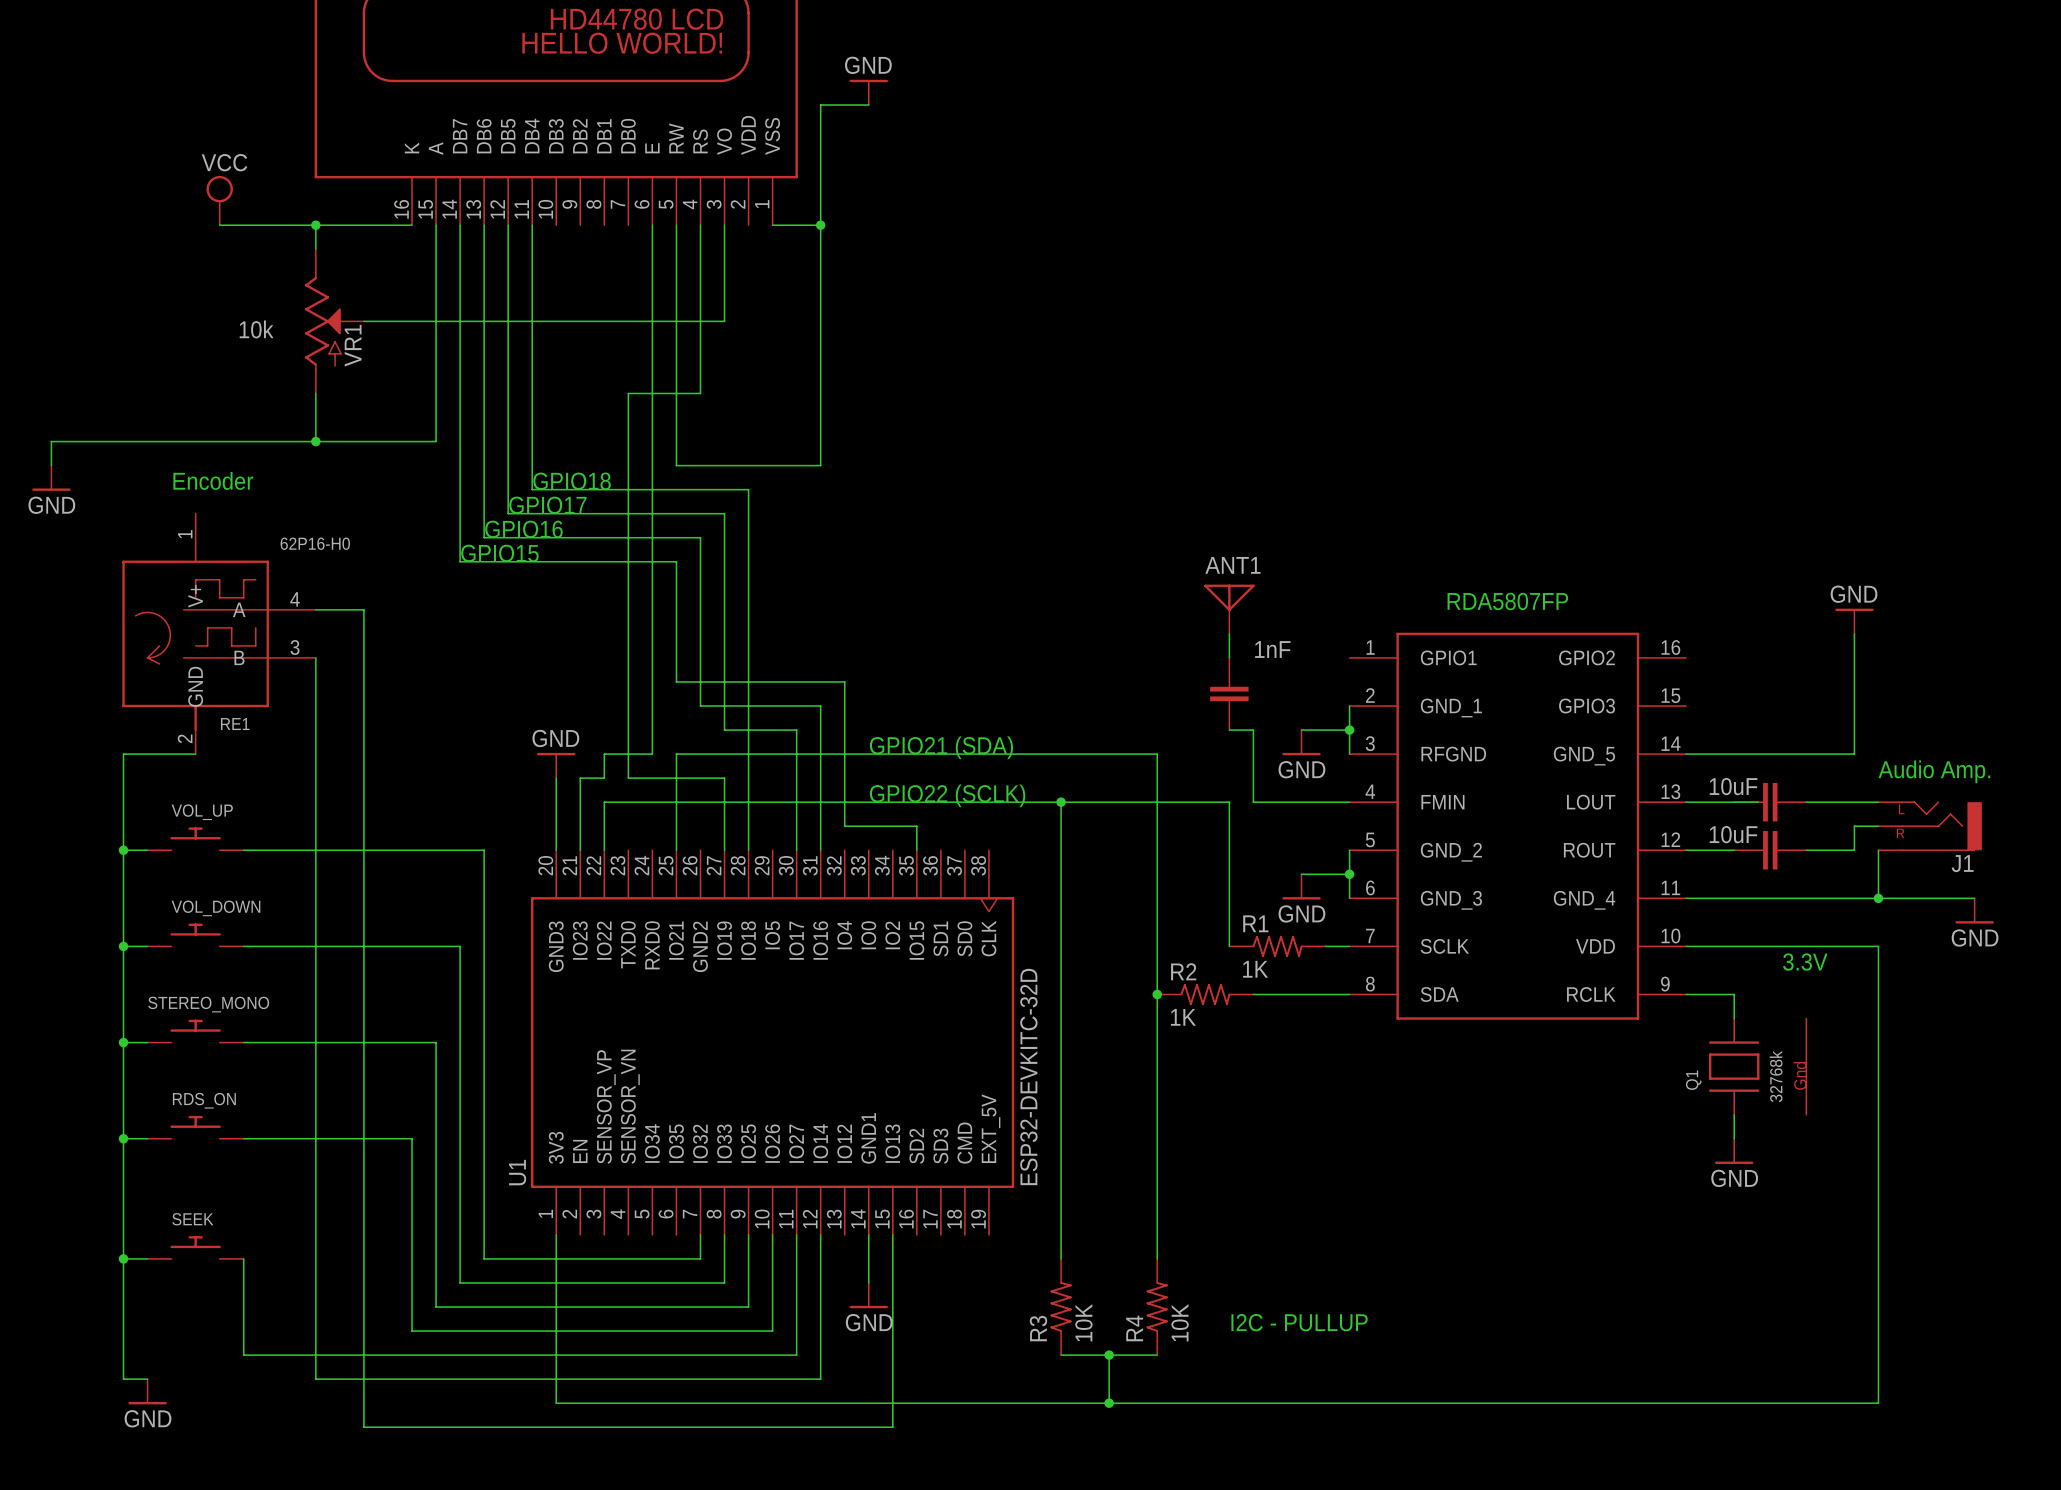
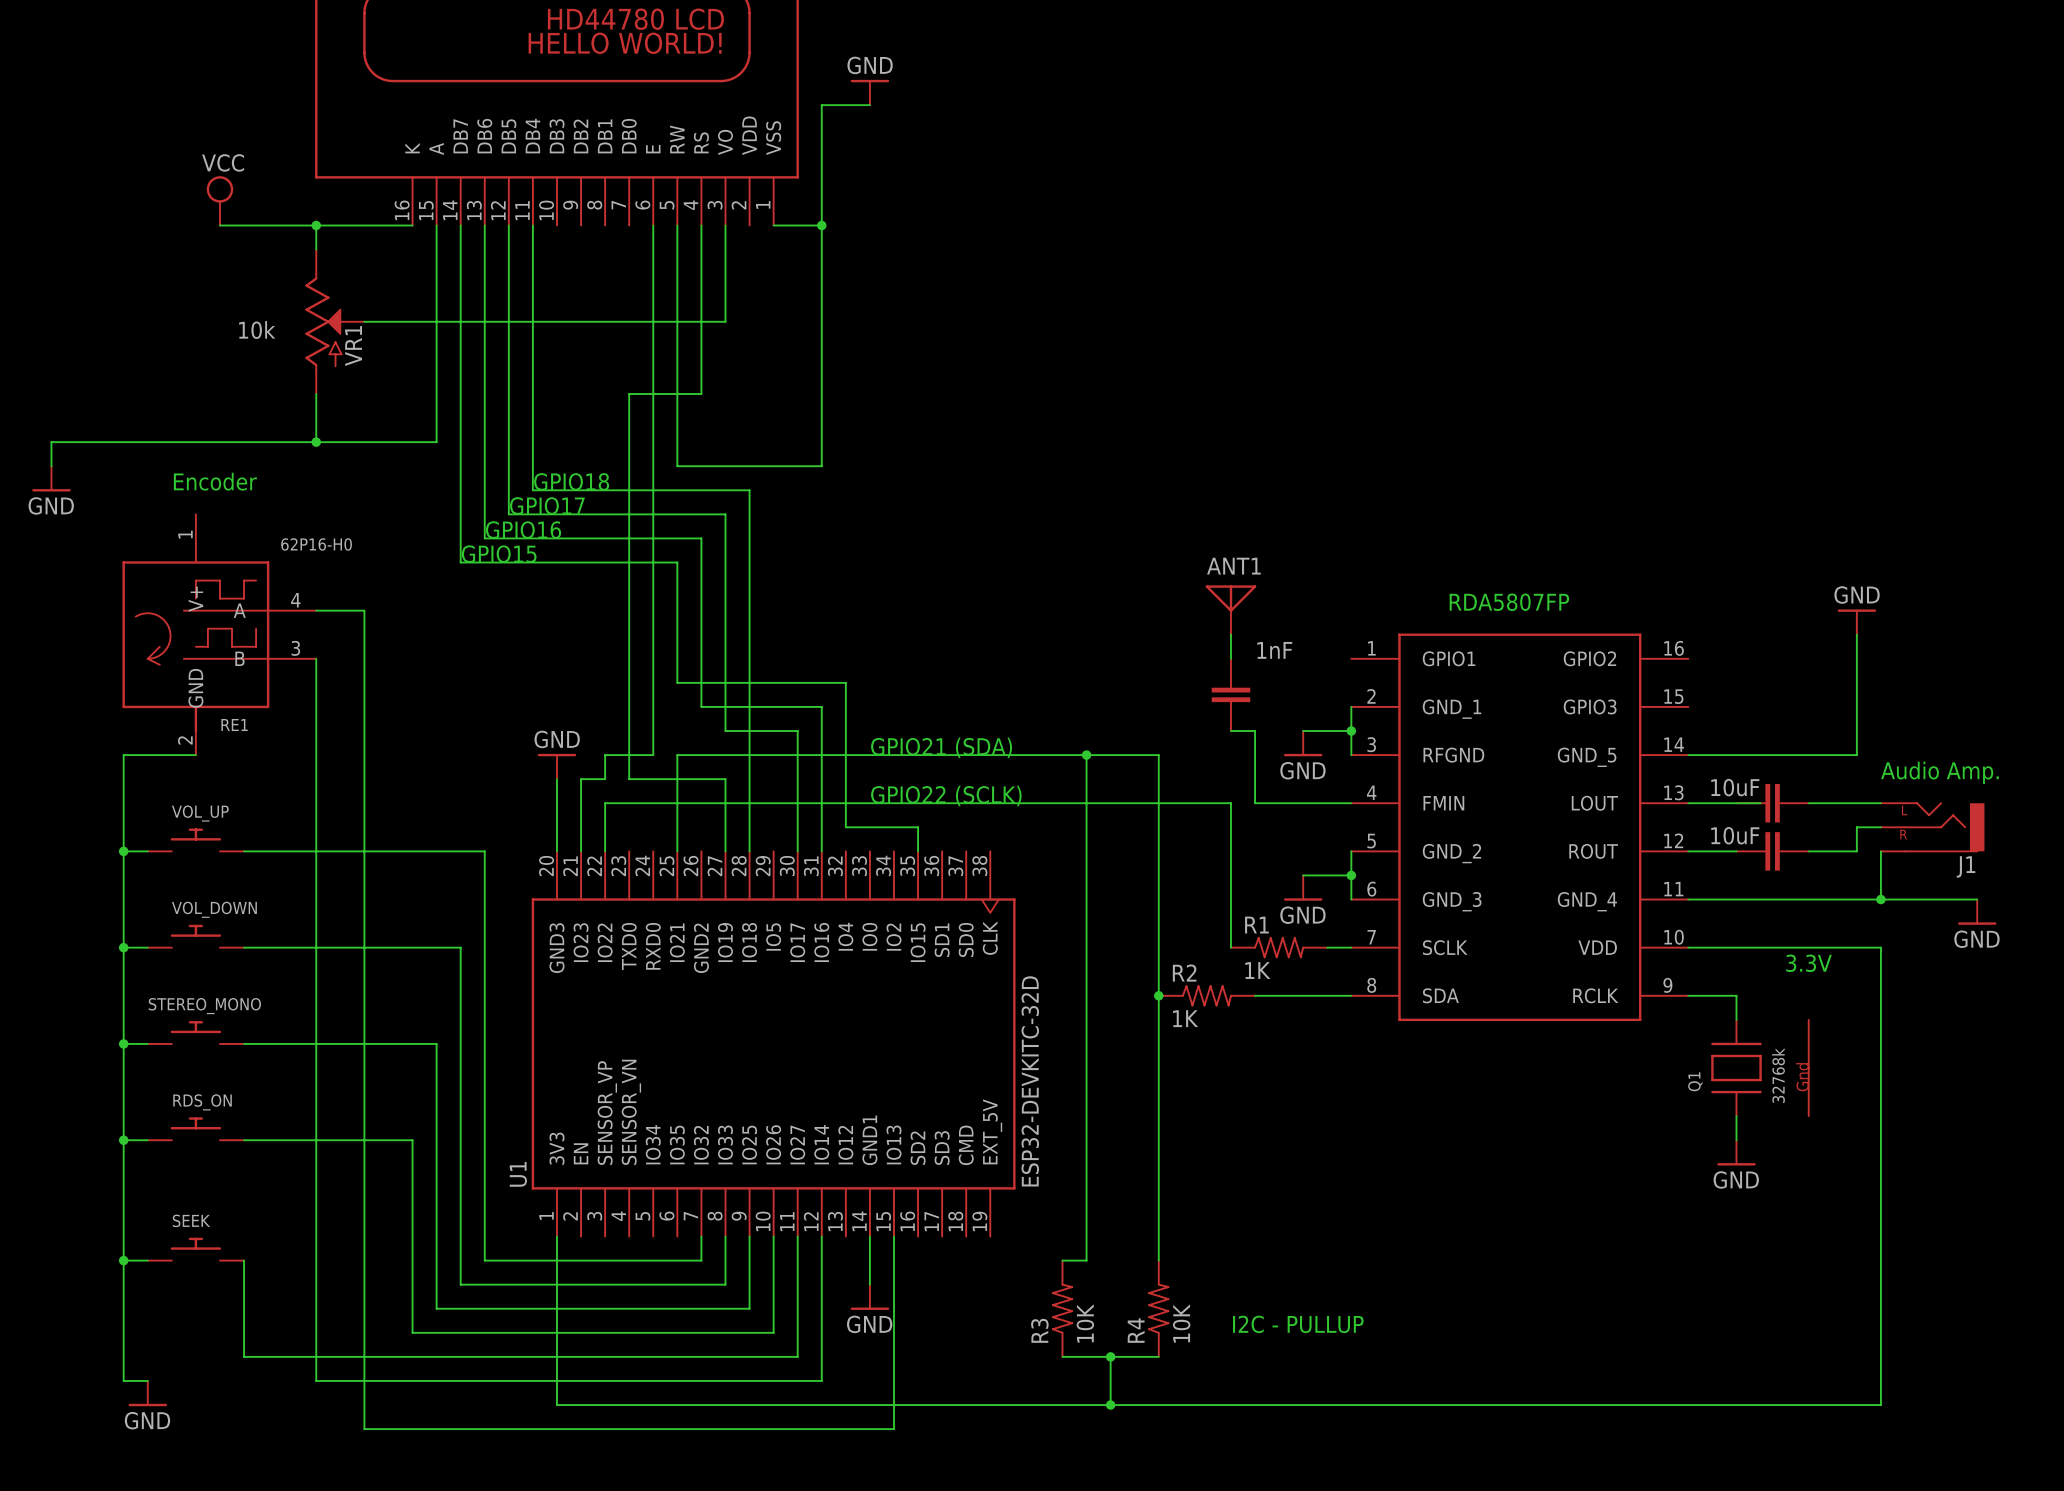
wire: (1061, 802) (1061, 1258) -> (1086, 755) (1086, 1260) (1062, 1260)
junction position: (1061, 802) -> (1086, 755)

